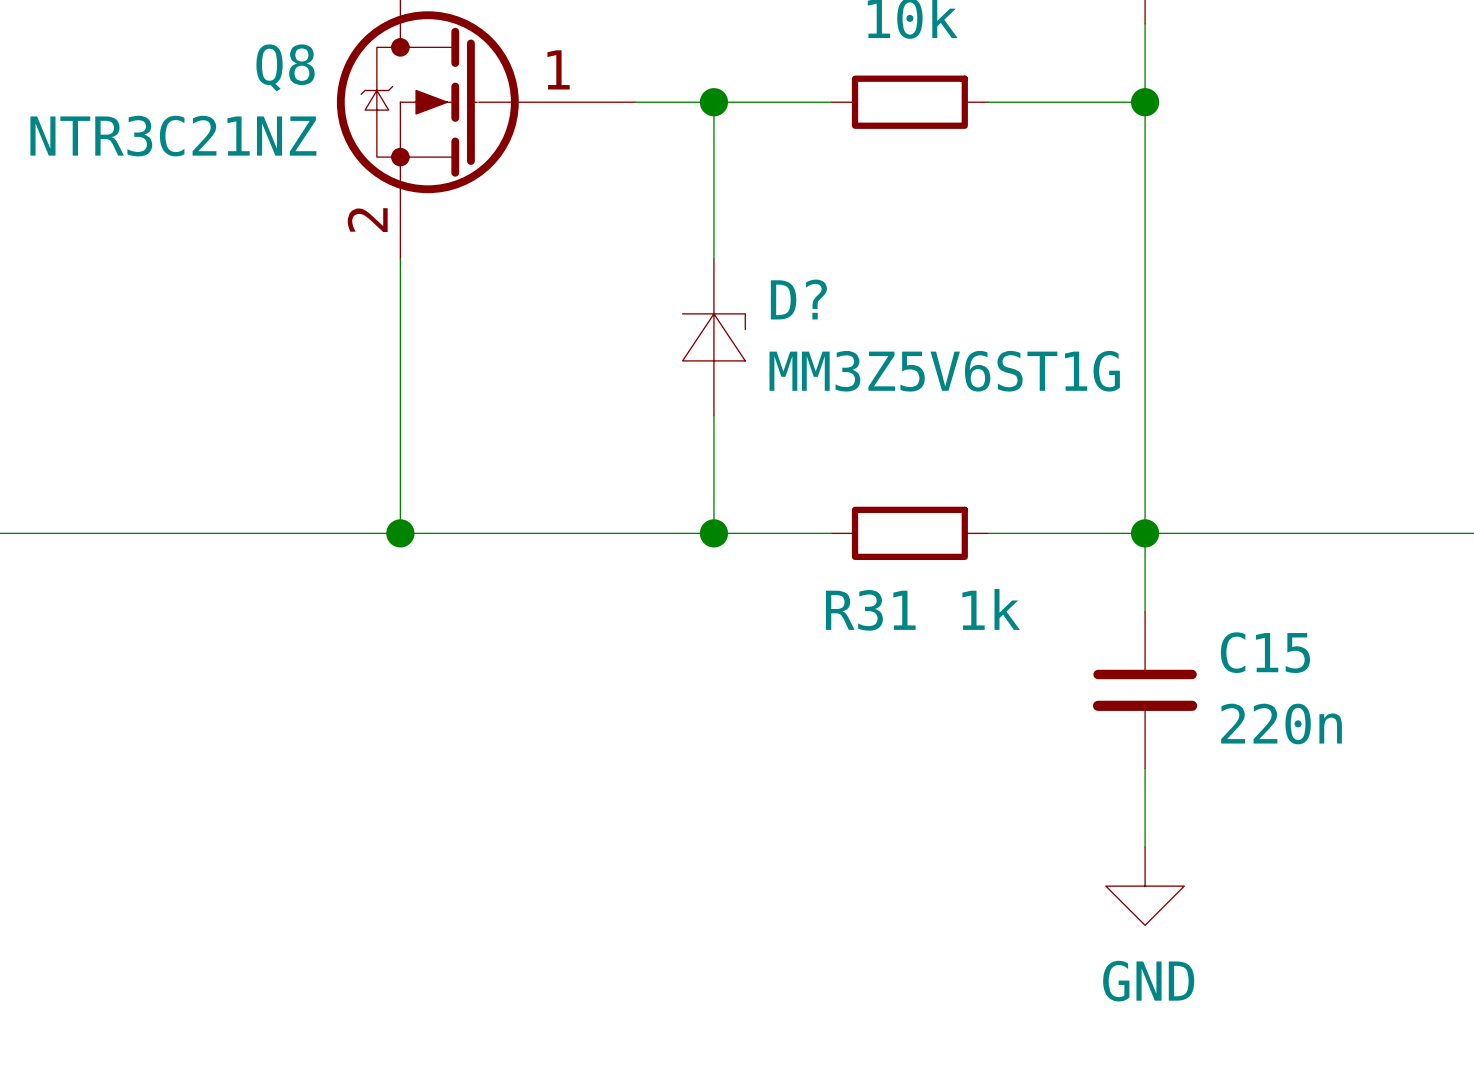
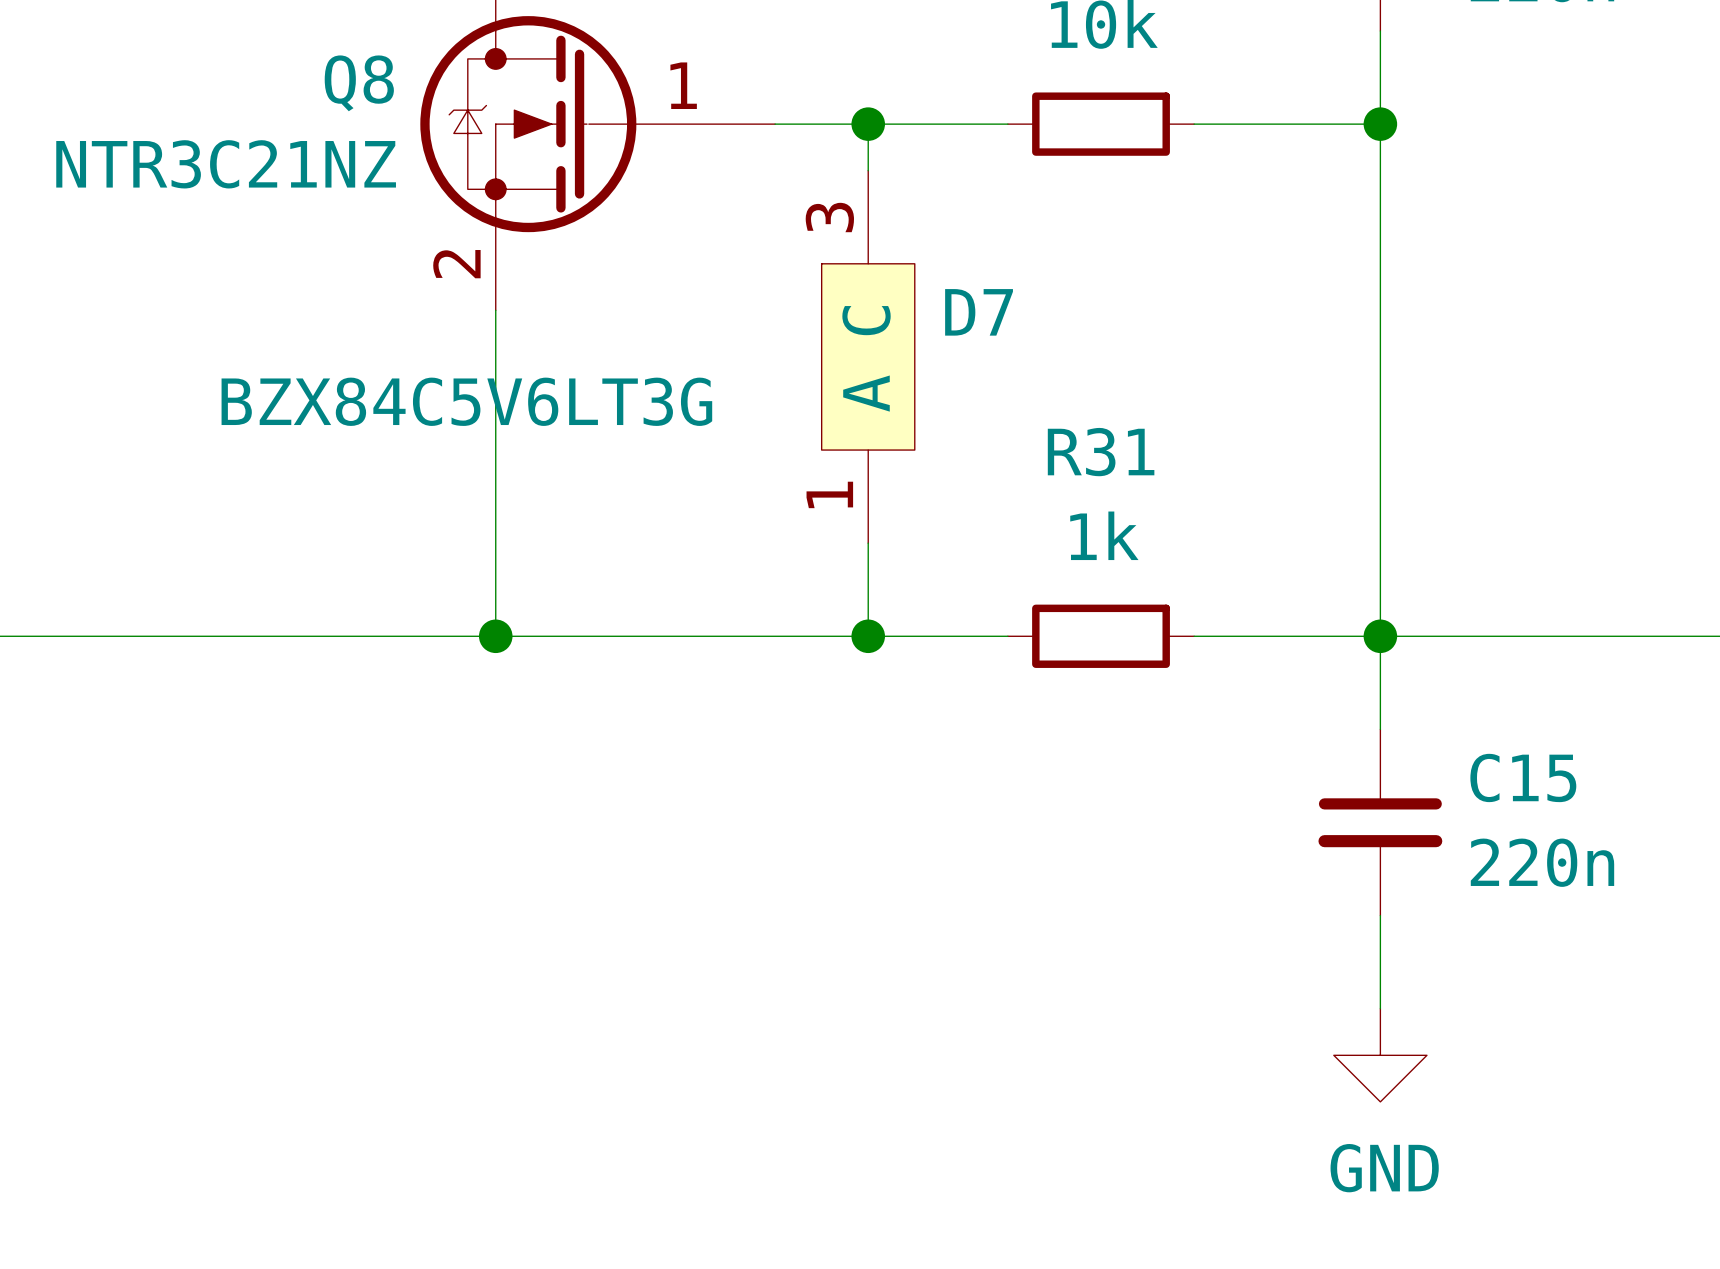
D7: none -> BZX84C5V6LT3G (868, 356)
D?: MM3Z5V6ST1G (713, 337) -> none
R31 value position: 1k (991, 609) -> 1k (1104, 535)
R31 name position: R31 (870, 610) -> R31 (1101, 452)

